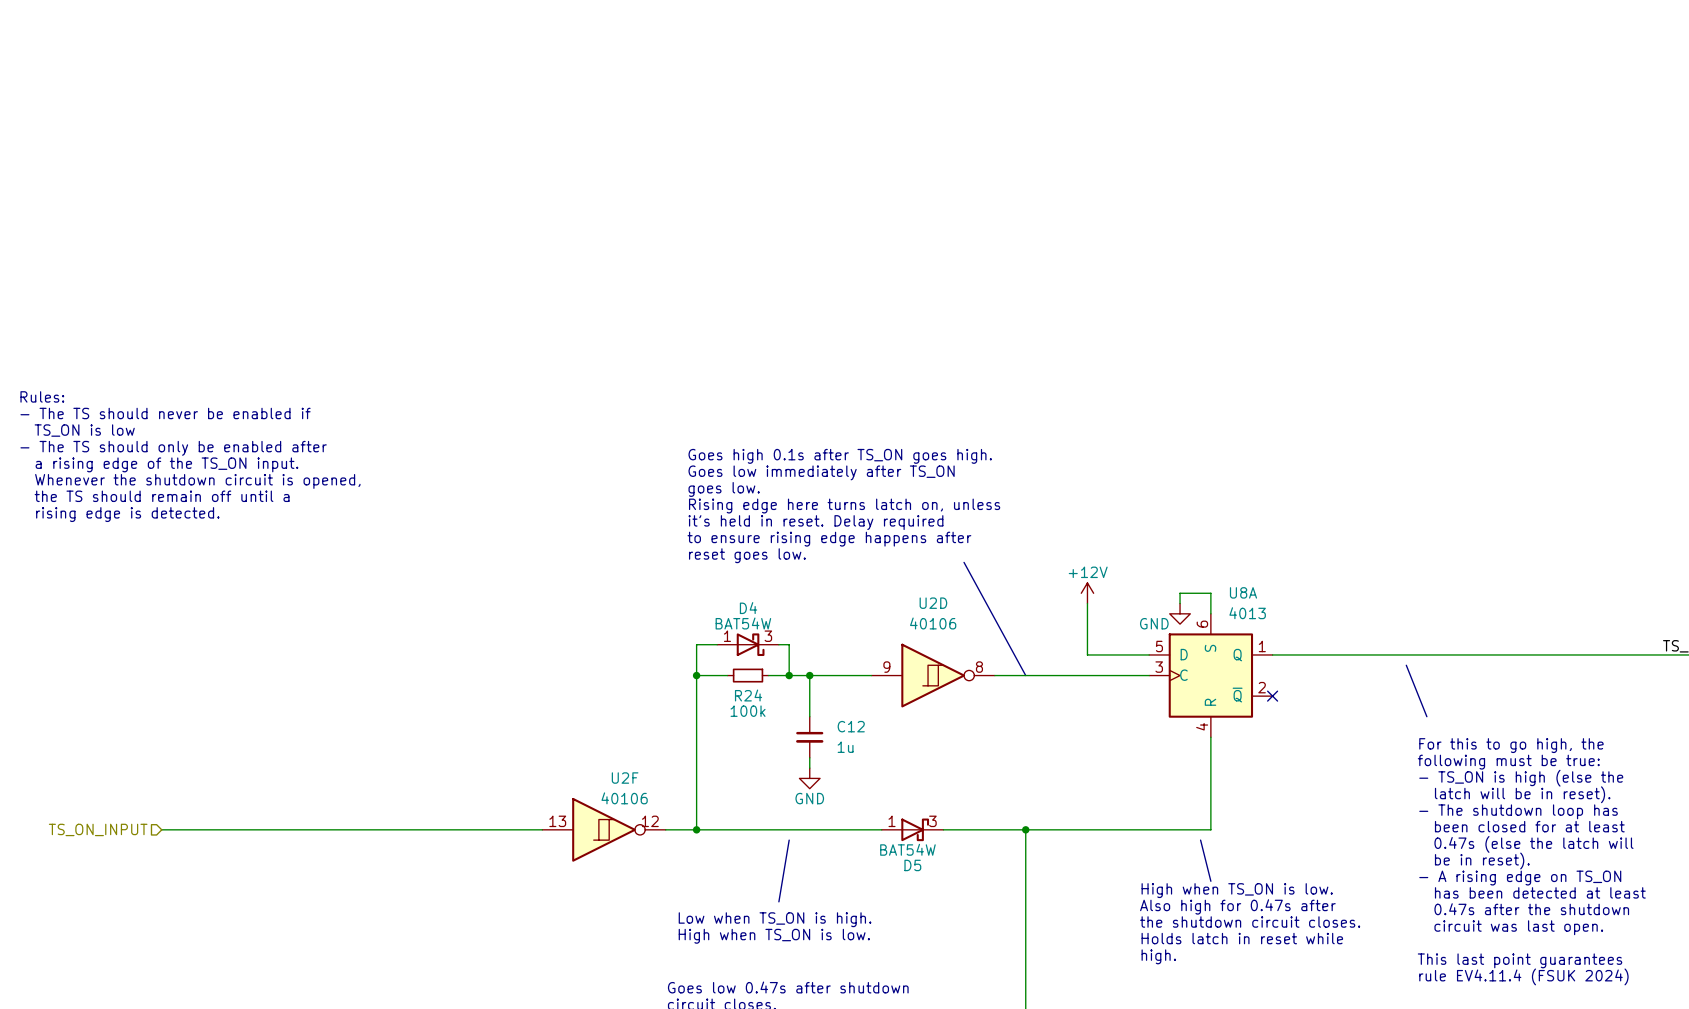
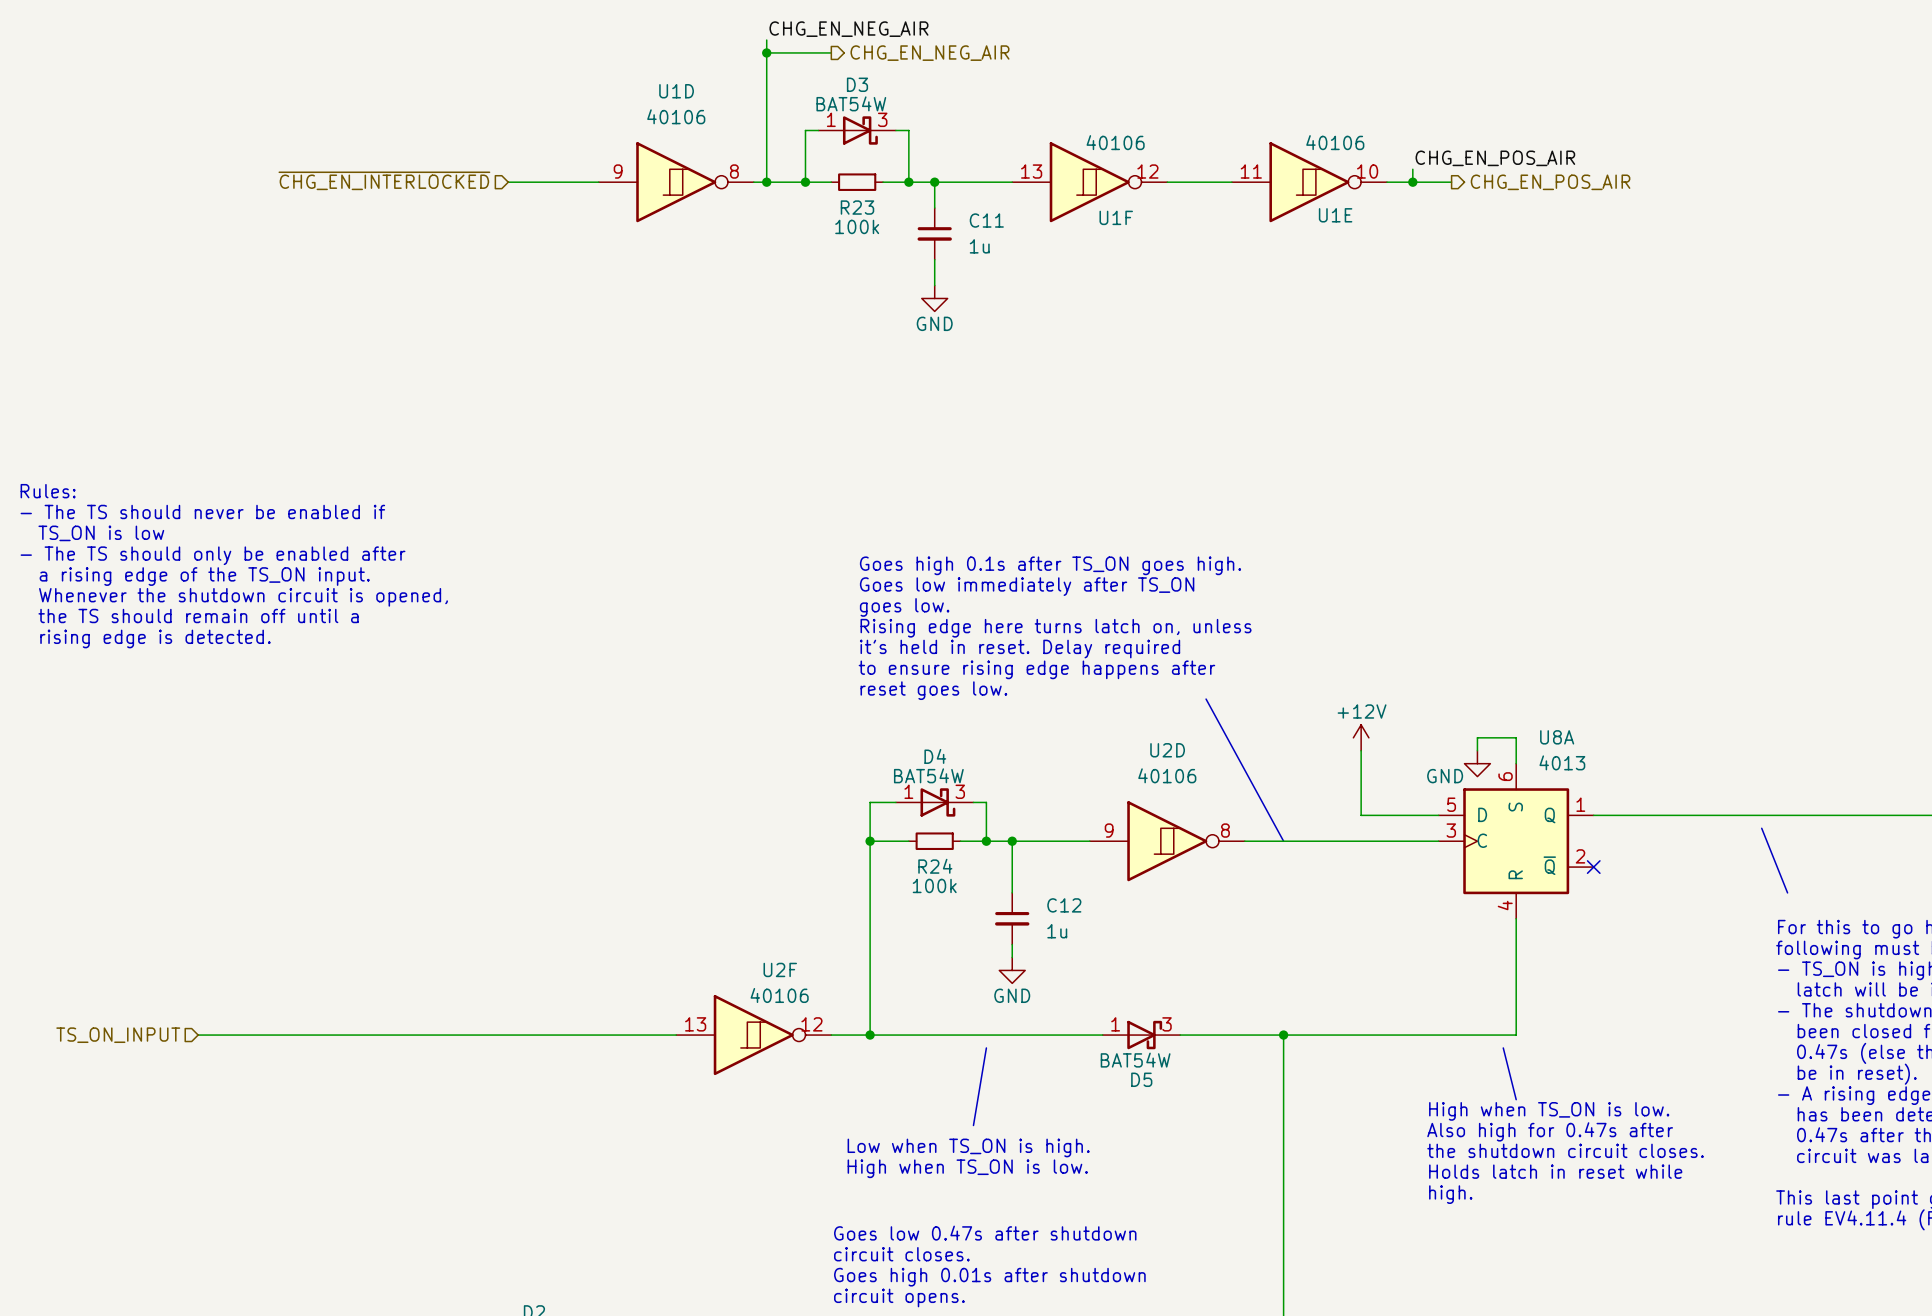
label: none -> CHG_EN_NEG_AIR (848, 29)
wire: none -> (766, 40) (766, 182)
wire: none -> (766, 52) (831, 52)
junction: none -> (766, 52)
hierarchical label: none -> CHG_EN_NEG_AIR (929, 53)
wire: none -> (818, 130) (805, 130) (805, 182)
D3: none -> BAT54W (857, 130)
wire: none -> (895, 130) (908, 130) (908, 182)
label: none -> CHG_EN_POS_AIR (1495, 158)
wire: none -> (1412, 169) (1412, 182)
hierarchical label: none -> ~{CHG_EN_INTERLOCKED} (384, 180)
wire: none -> (508, 182) (598, 182)
U1D: none -> 40106 (676, 182)
wire: none -> (753, 182) (831, 182)
junction: none -> (766, 182)
junction: none -> (805, 182)
R23: none -> 100k (857, 182)
wire: none -> (883, 182) (1012, 182)
junction: none -> (908, 182)
wire: none -> (934, 182) (934, 208)
junction: none -> (934, 182)
U1F: none -> 40106 (1089, 182)
wire: none -> (1167, 182) (1231, 182)
U1E: none -> 40106 (1309, 182)
wire: none -> (1386, 182) (1451, 182)
junction: none -> (1412, 182)
hierarchical label: none -> CHG_EN_POS_AIR (1550, 182)
C11: none -> 1u (934, 233)
wire: none -> (934, 259) (934, 285)
power symbol: none -> GND (934, 298)

